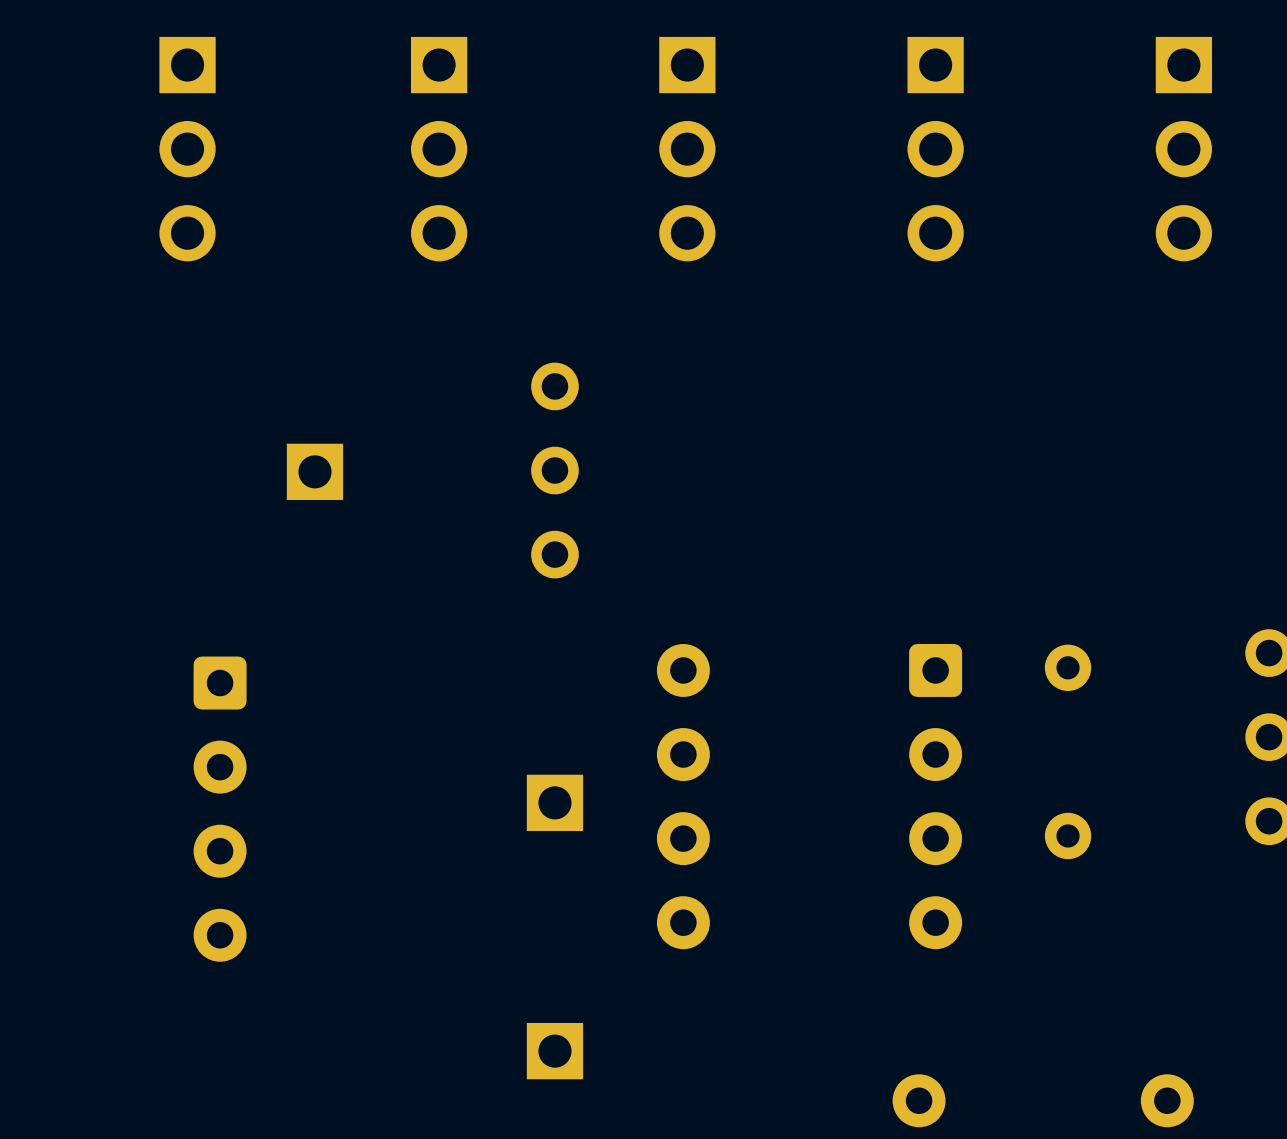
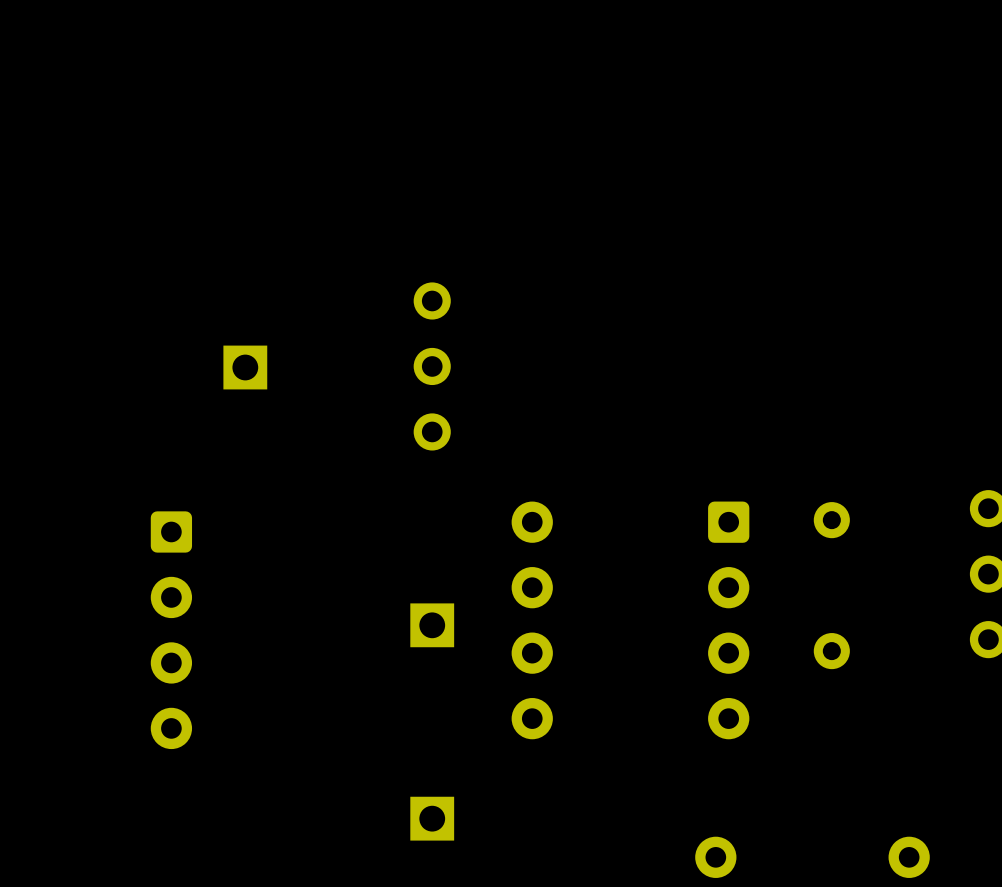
part: (187, 149) -> none
part: (439, 149) -> none
part: (687, 149) -> none
part: (935, 149) -> none
part: (1183, 149) -> none

